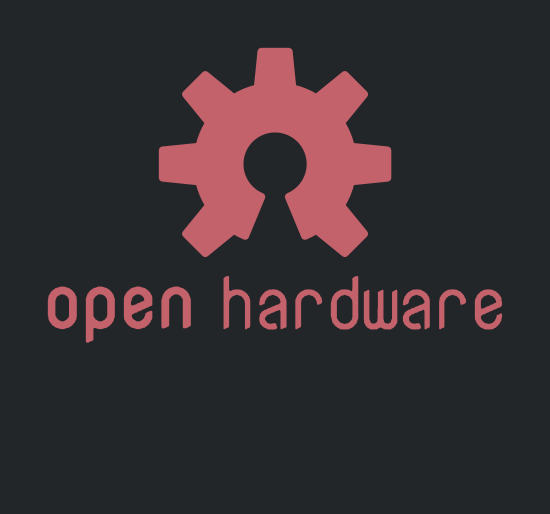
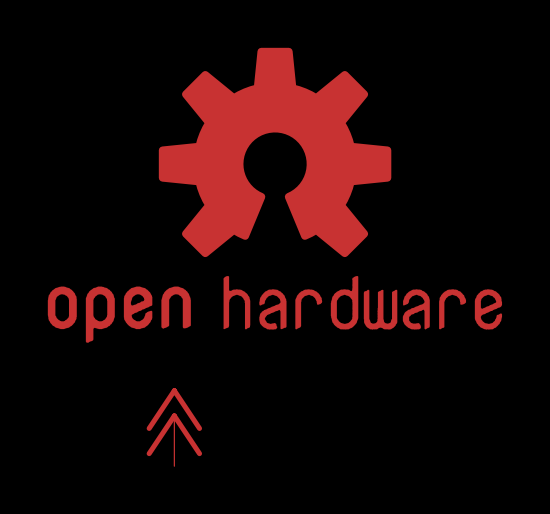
power symbol: none -> (174, 427)

